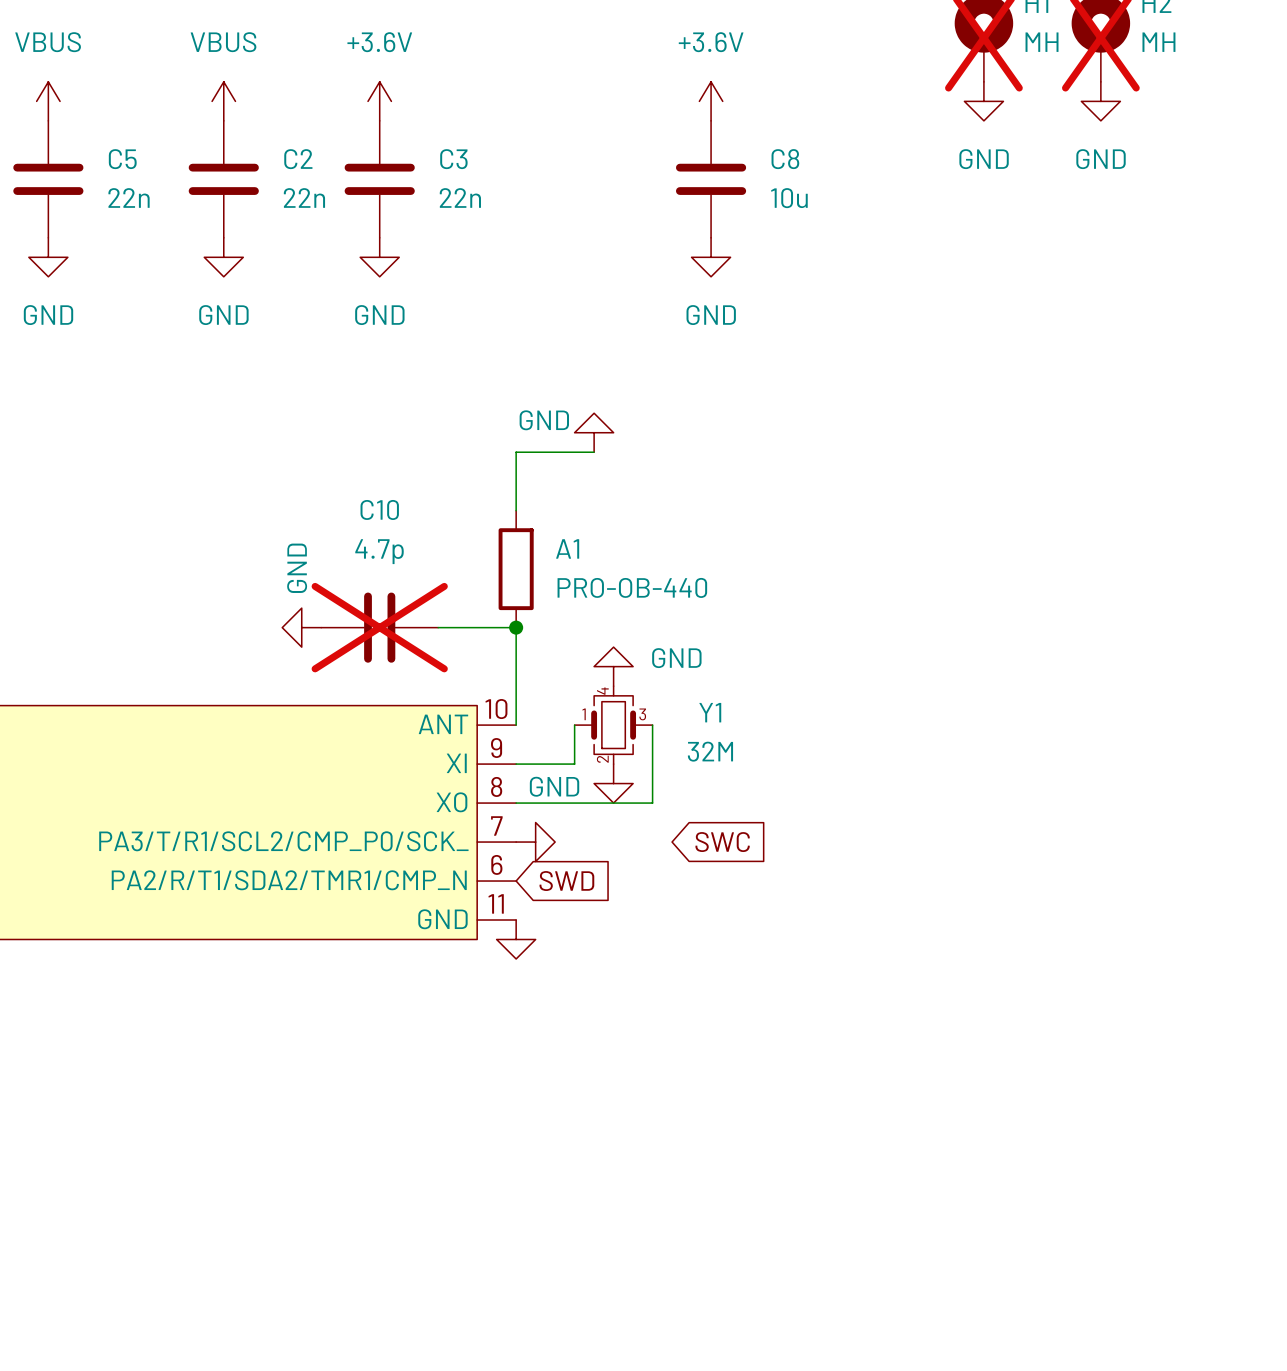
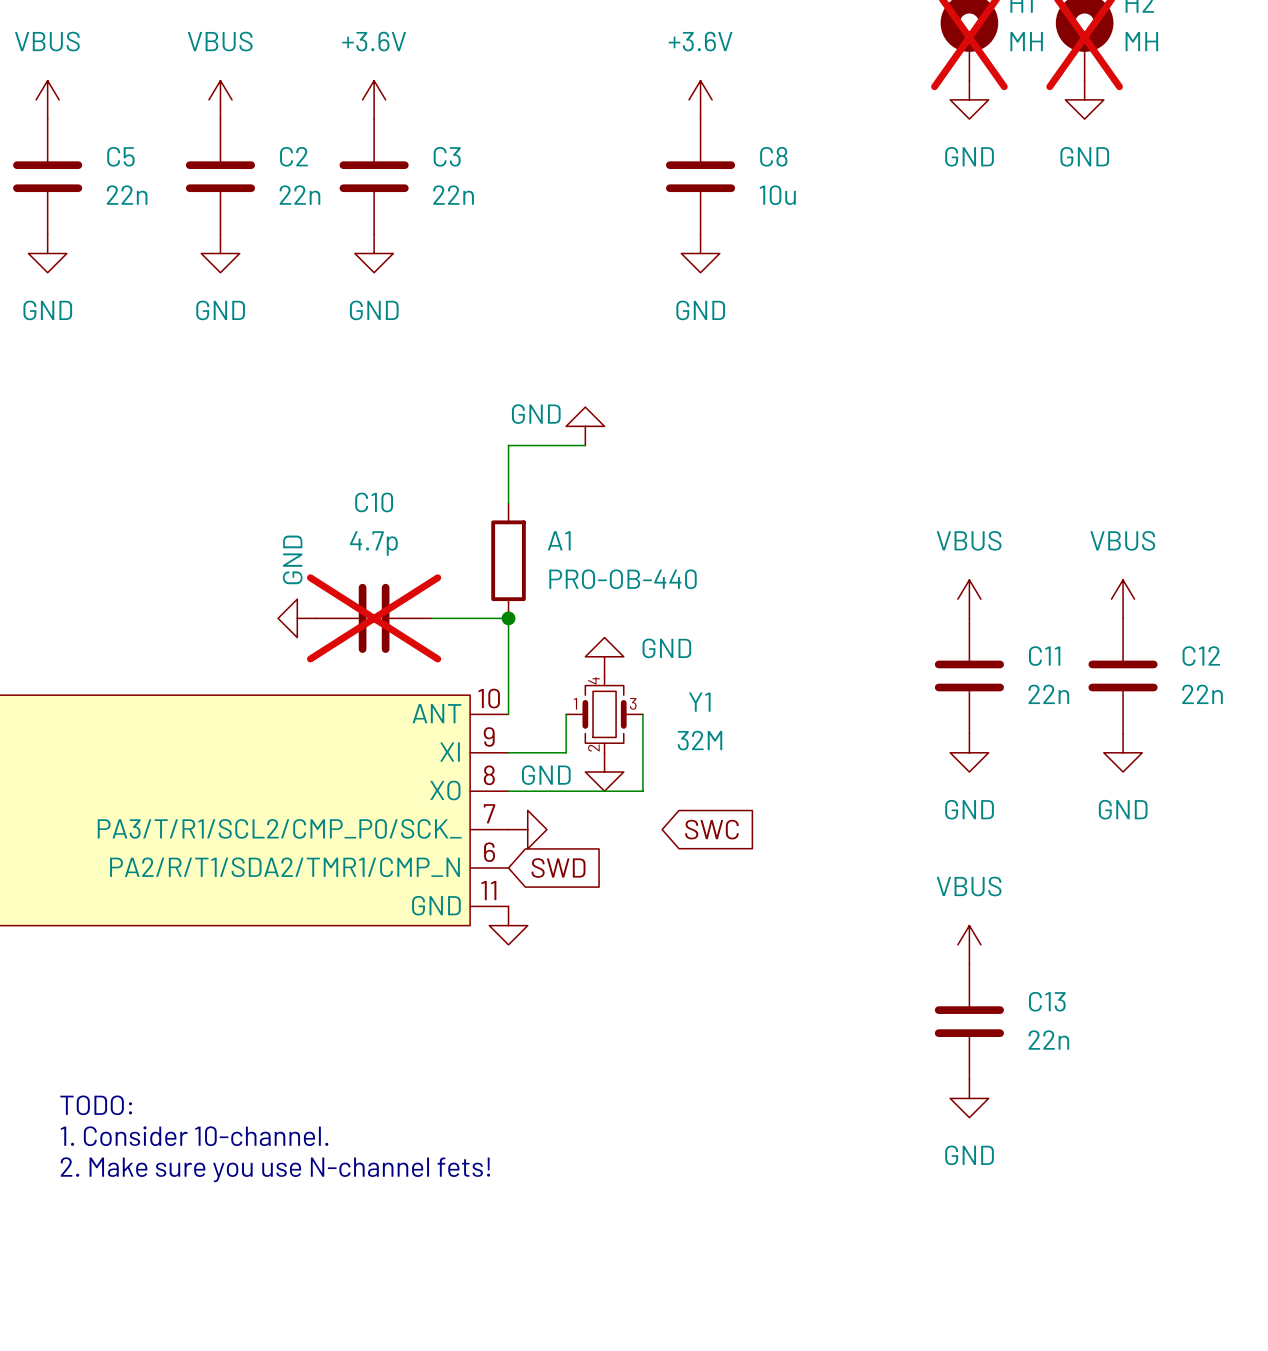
power symbol: none -> VBUS (969, 599)
power symbol: none -> VBUS (1123, 599)
C11: none -> 22n (969, 675)
C12: none -> 22n (1123, 675)
power symbol: none -> GND (969, 752)
power symbol: none -> GND (1123, 752)
power symbol: none -> VBUS (969, 944)
C13: none -> 22n (969, 1021)
power symbol: none -> GND (969, 1098)
text: none -> TODO: (96, 1105)
text: none -> 1. Consider 10-channel. (194, 1136)
text: none -> 2. Make sure you use N-channel fets! (275, 1169)

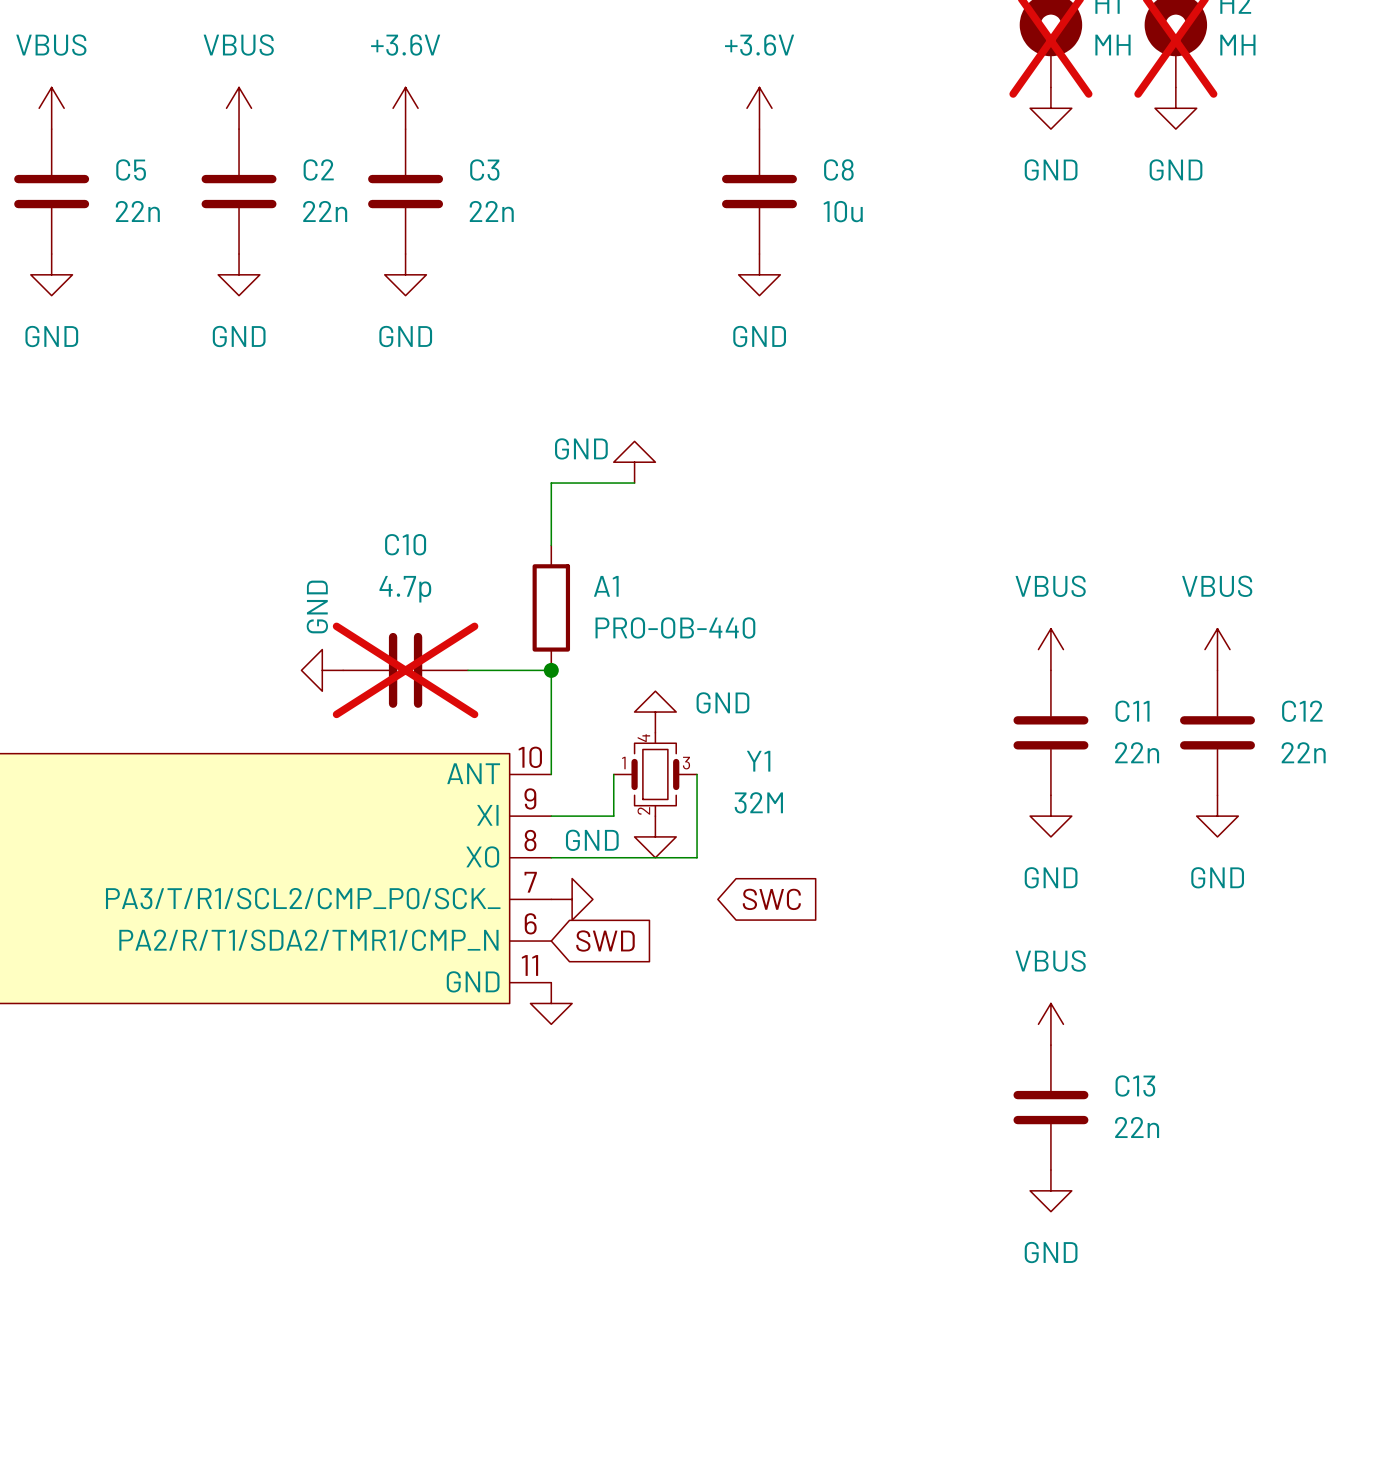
text: TODO: (96, 1105) -> none
text: 1. Consider 10-channel. (194, 1136) -> none
text: 2. Make sure you use N-channel fets! (275, 1169) -> none

